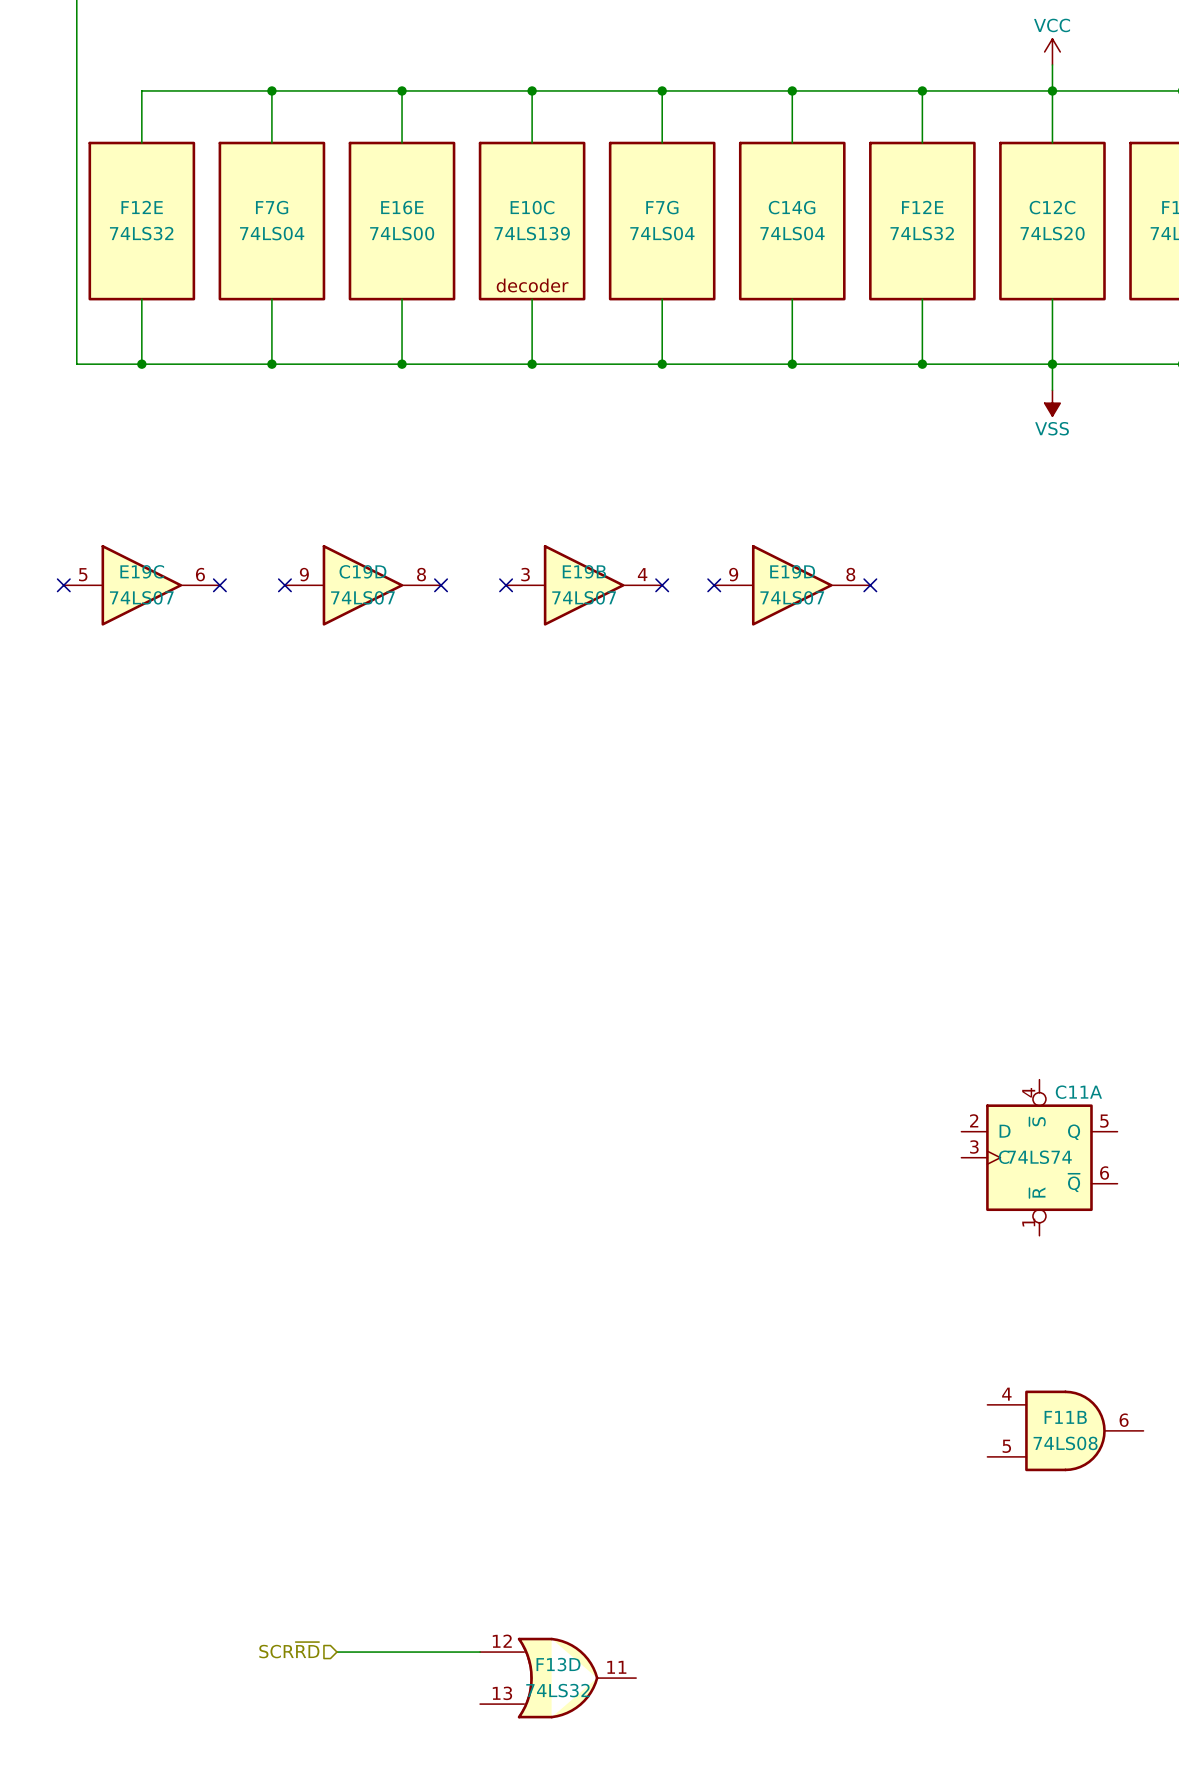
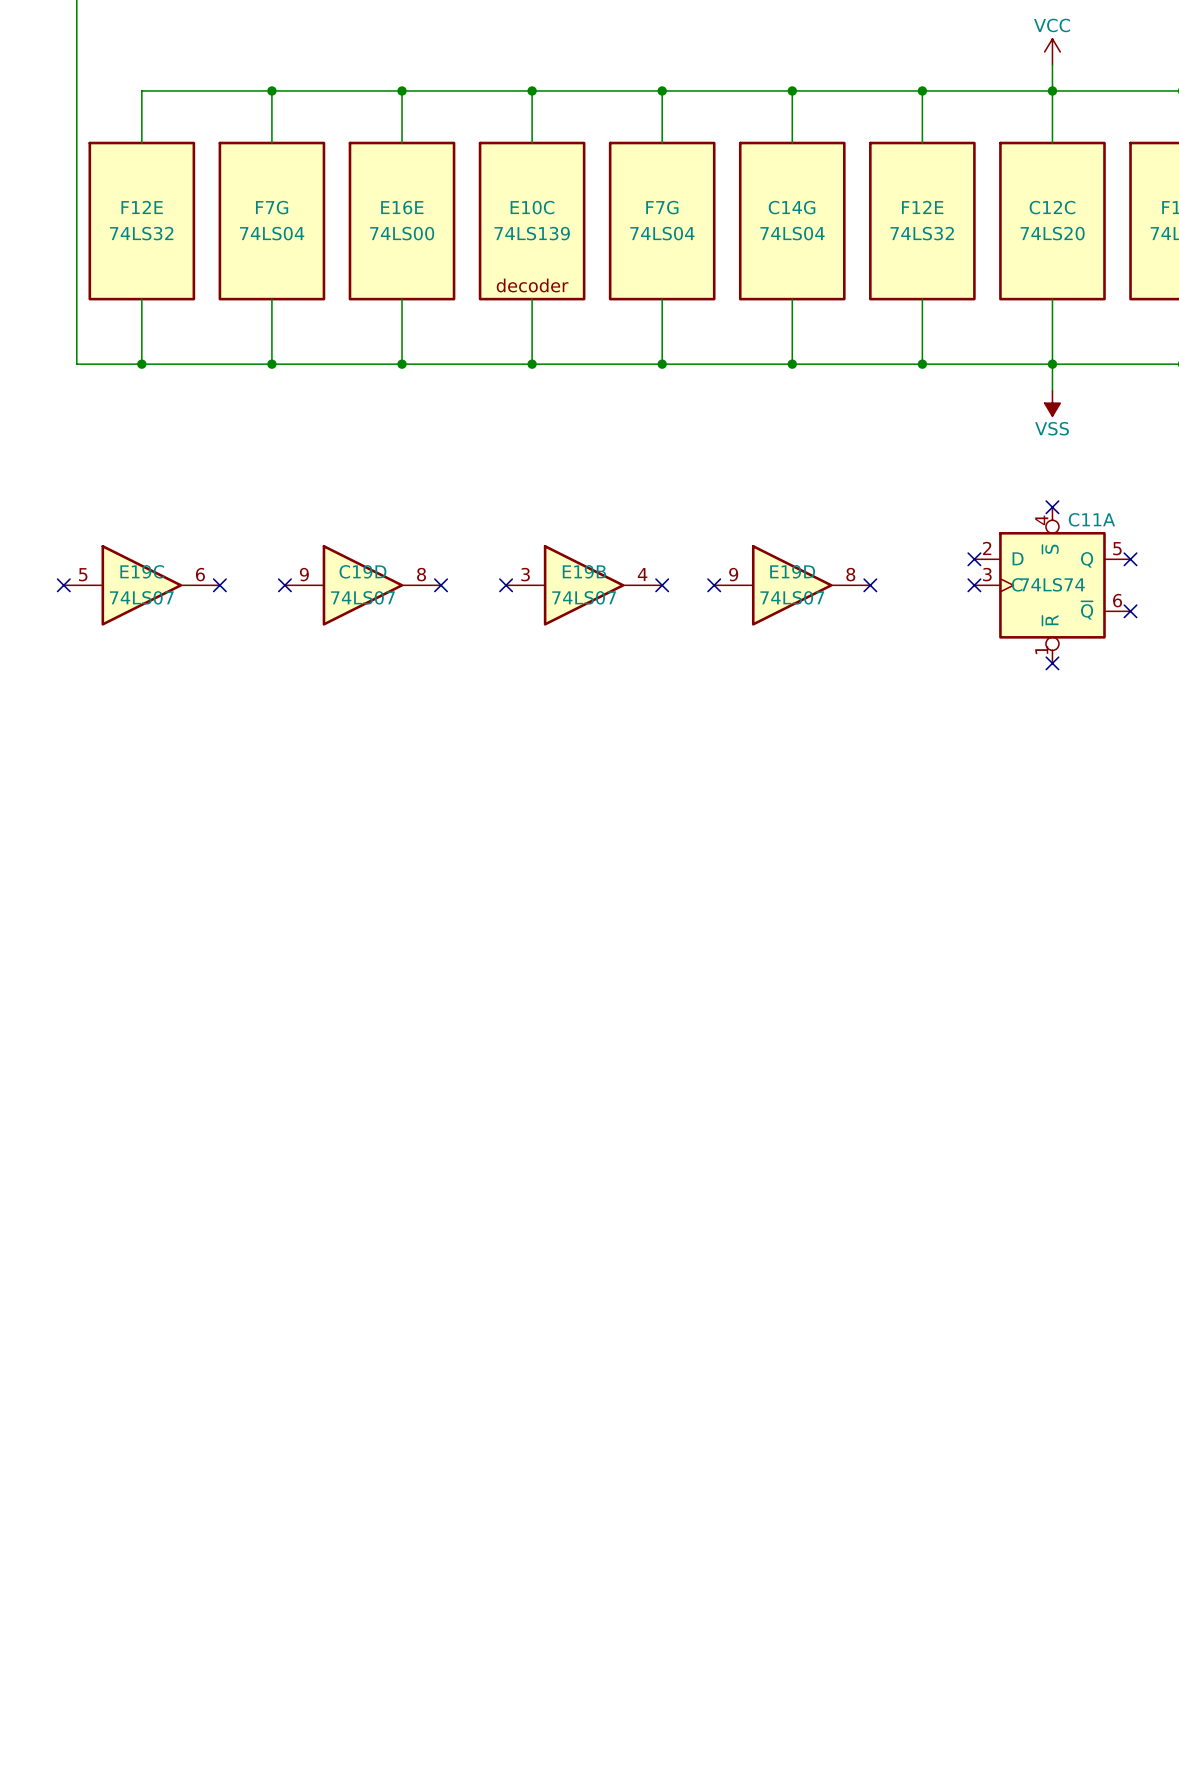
no-connect mark: none -> (1052, 507)
no-connect mark: none -> (974, 559)
no-connect mark: none -> (1130, 559)
no-connect mark: none -> (974, 585)
no-connect mark: none -> (1130, 611)
no-connect mark: none -> (1052, 663)
C11A position: (1039, 1157) -> (1052, 585)
F11B: 74LS08 (1065, 1430) -> none
hierarchical label: SCR~{RD} (289, 1650) -> none
wire: (336, 1652) (480, 1652) -> none
F13D: 74LS32 (558, 1678) -> none

